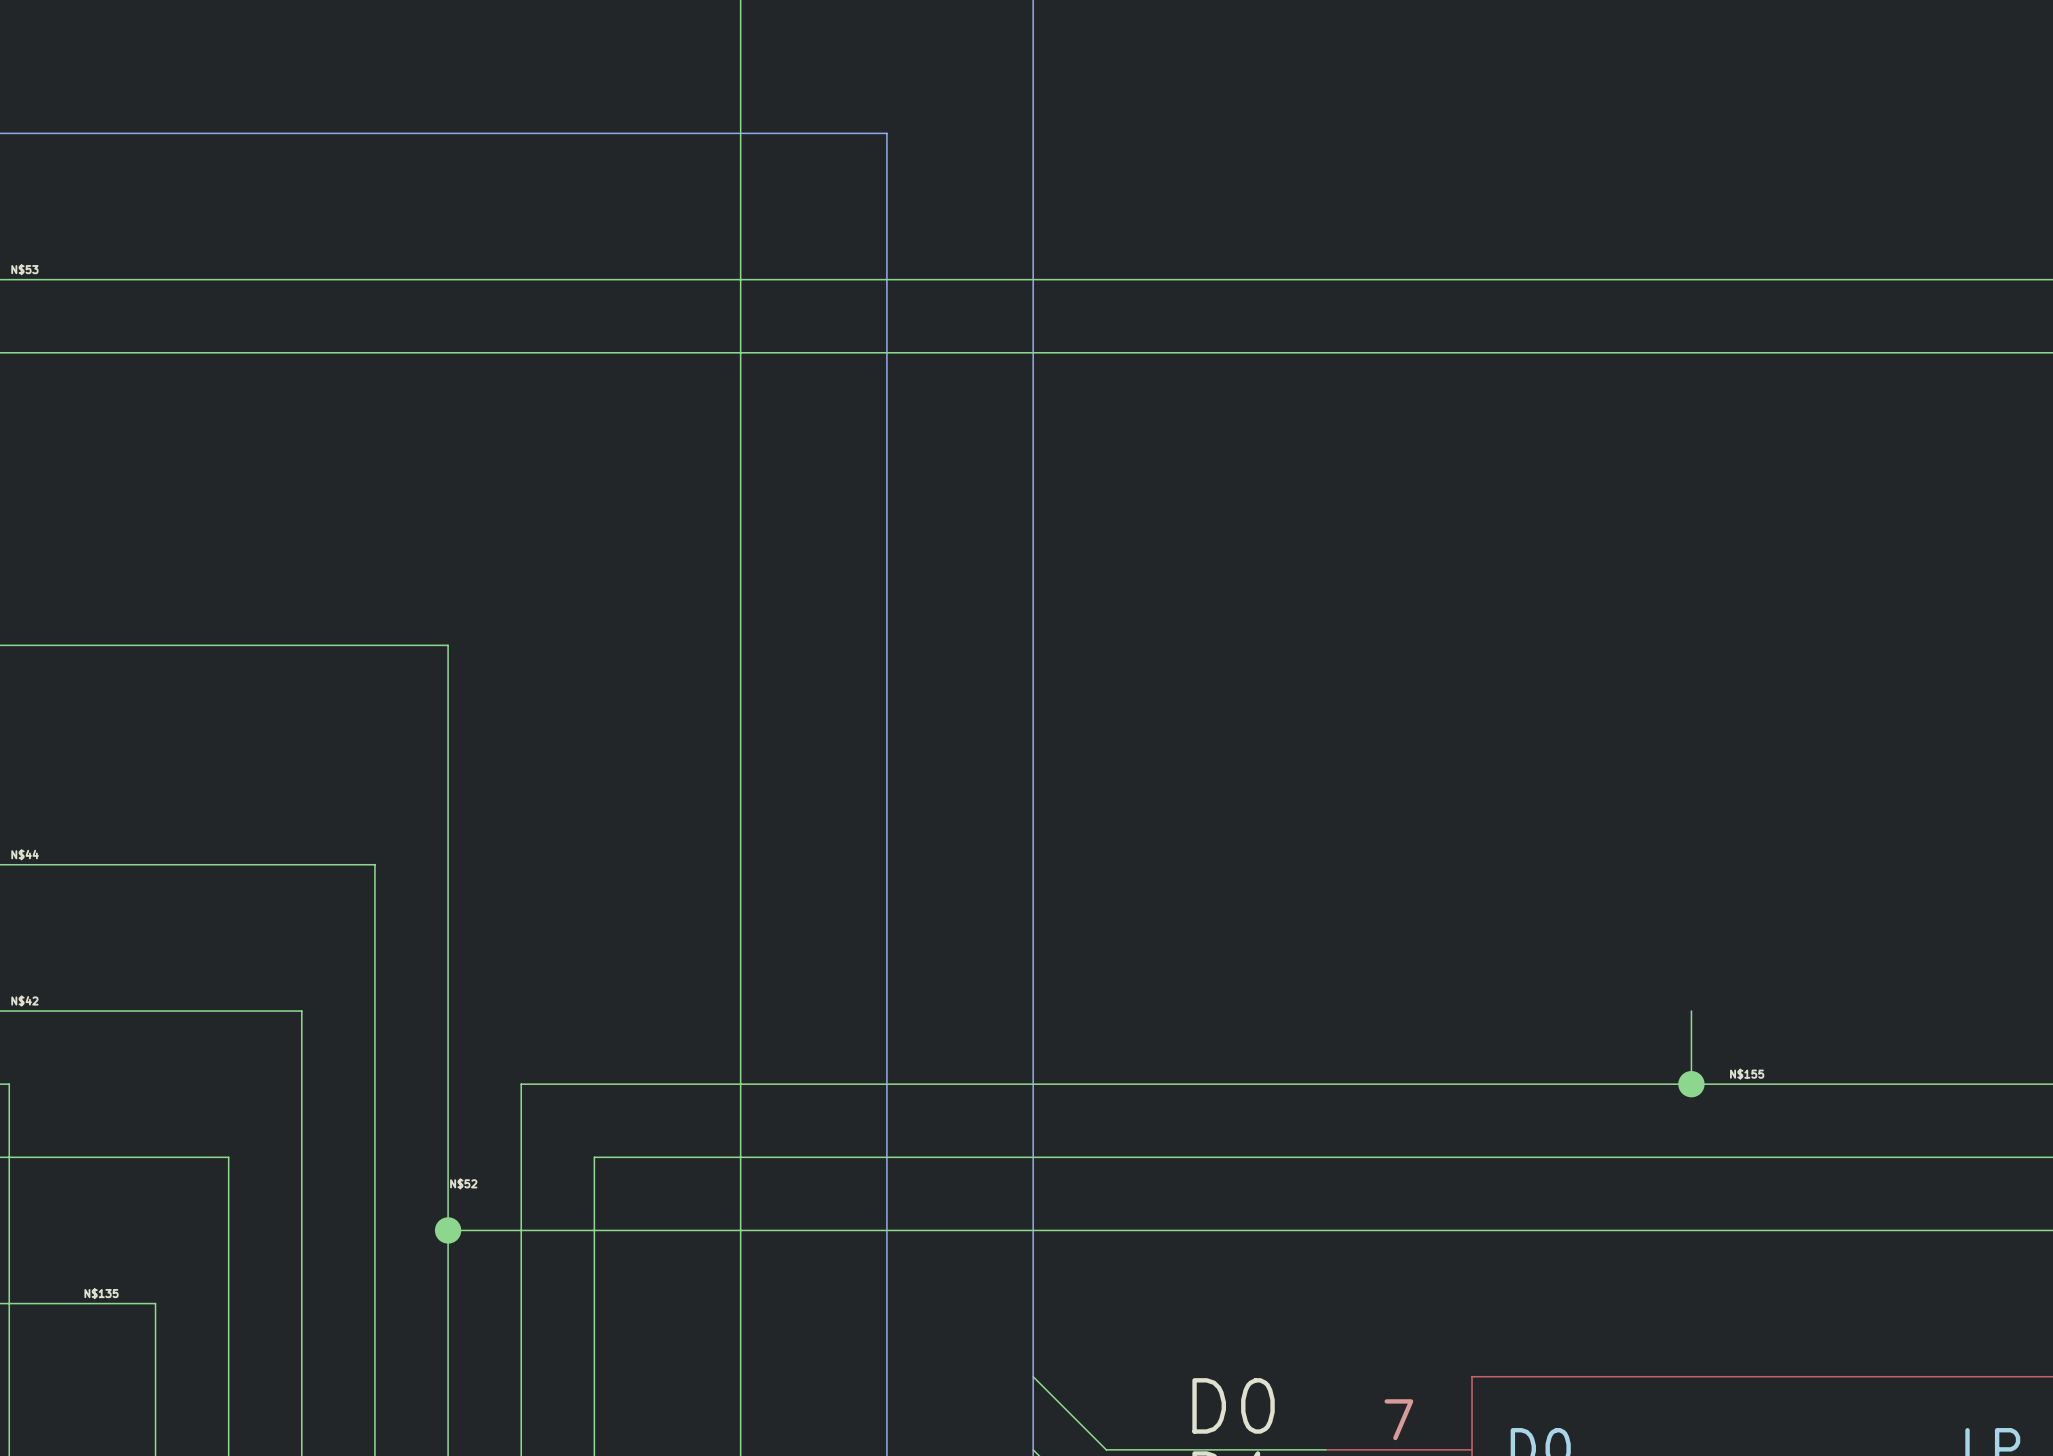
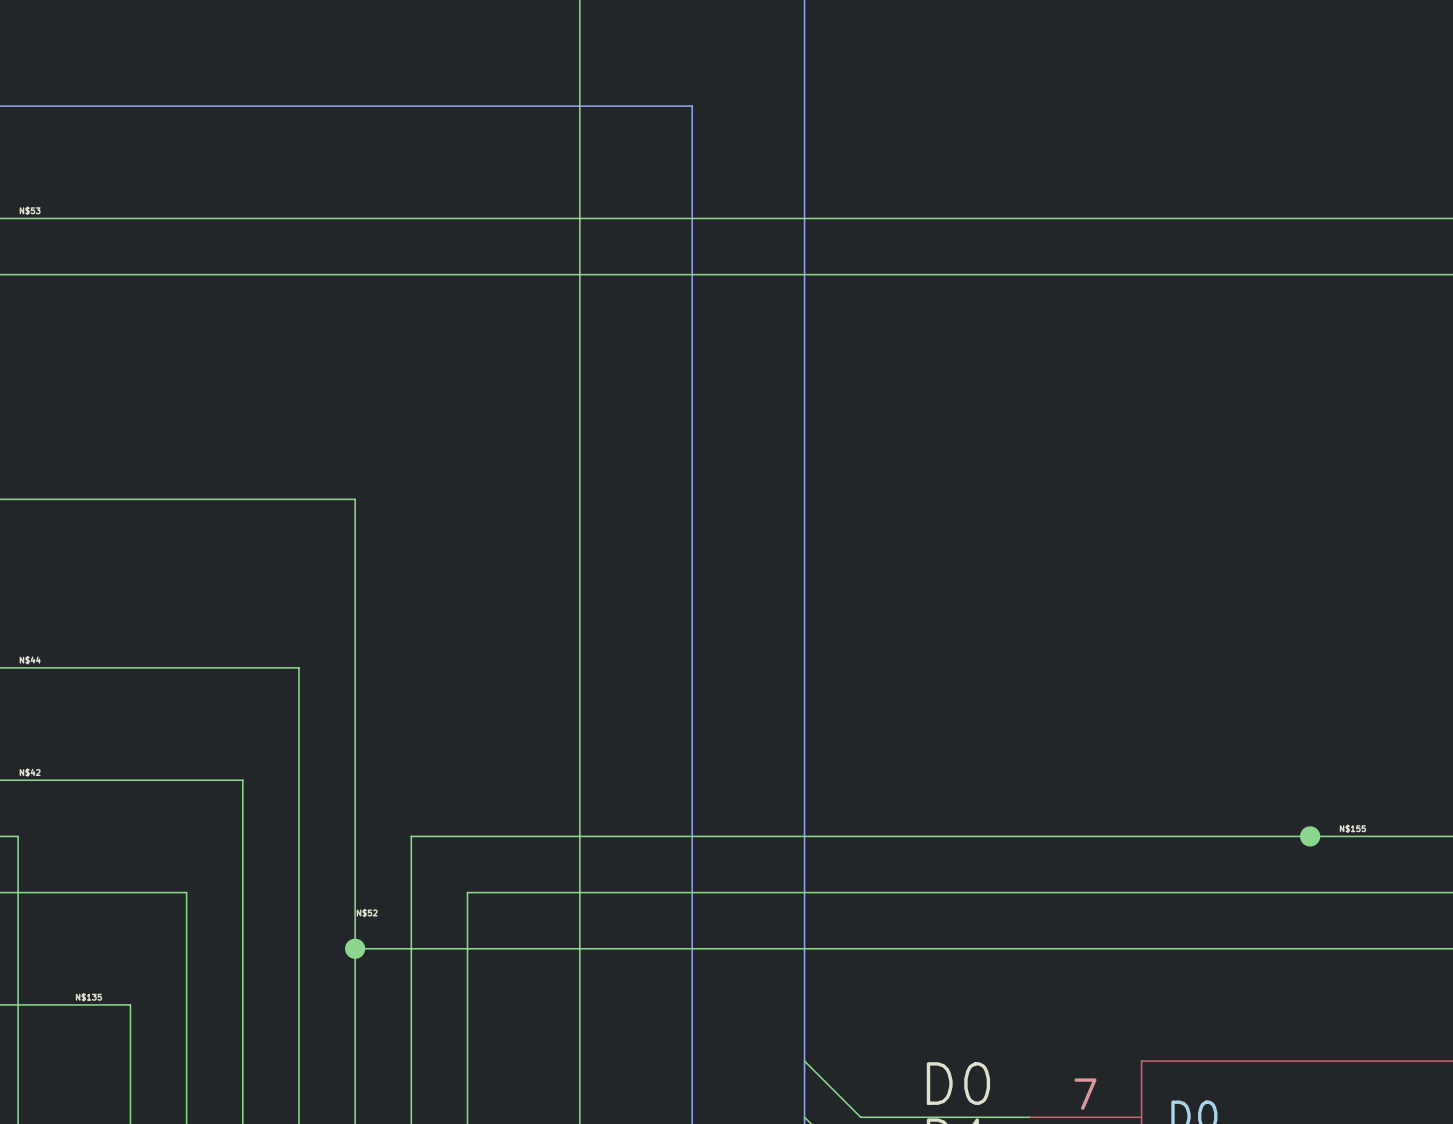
wire: (1691, 1011) (1691, 1084) -> none

